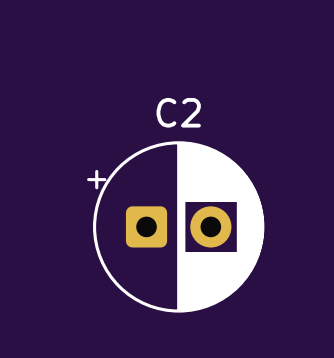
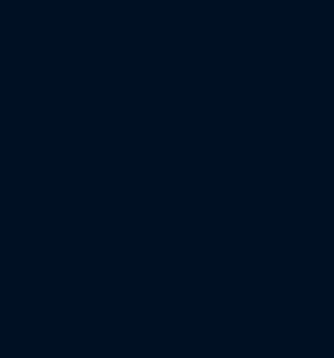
C2: (175, 226) -> none

